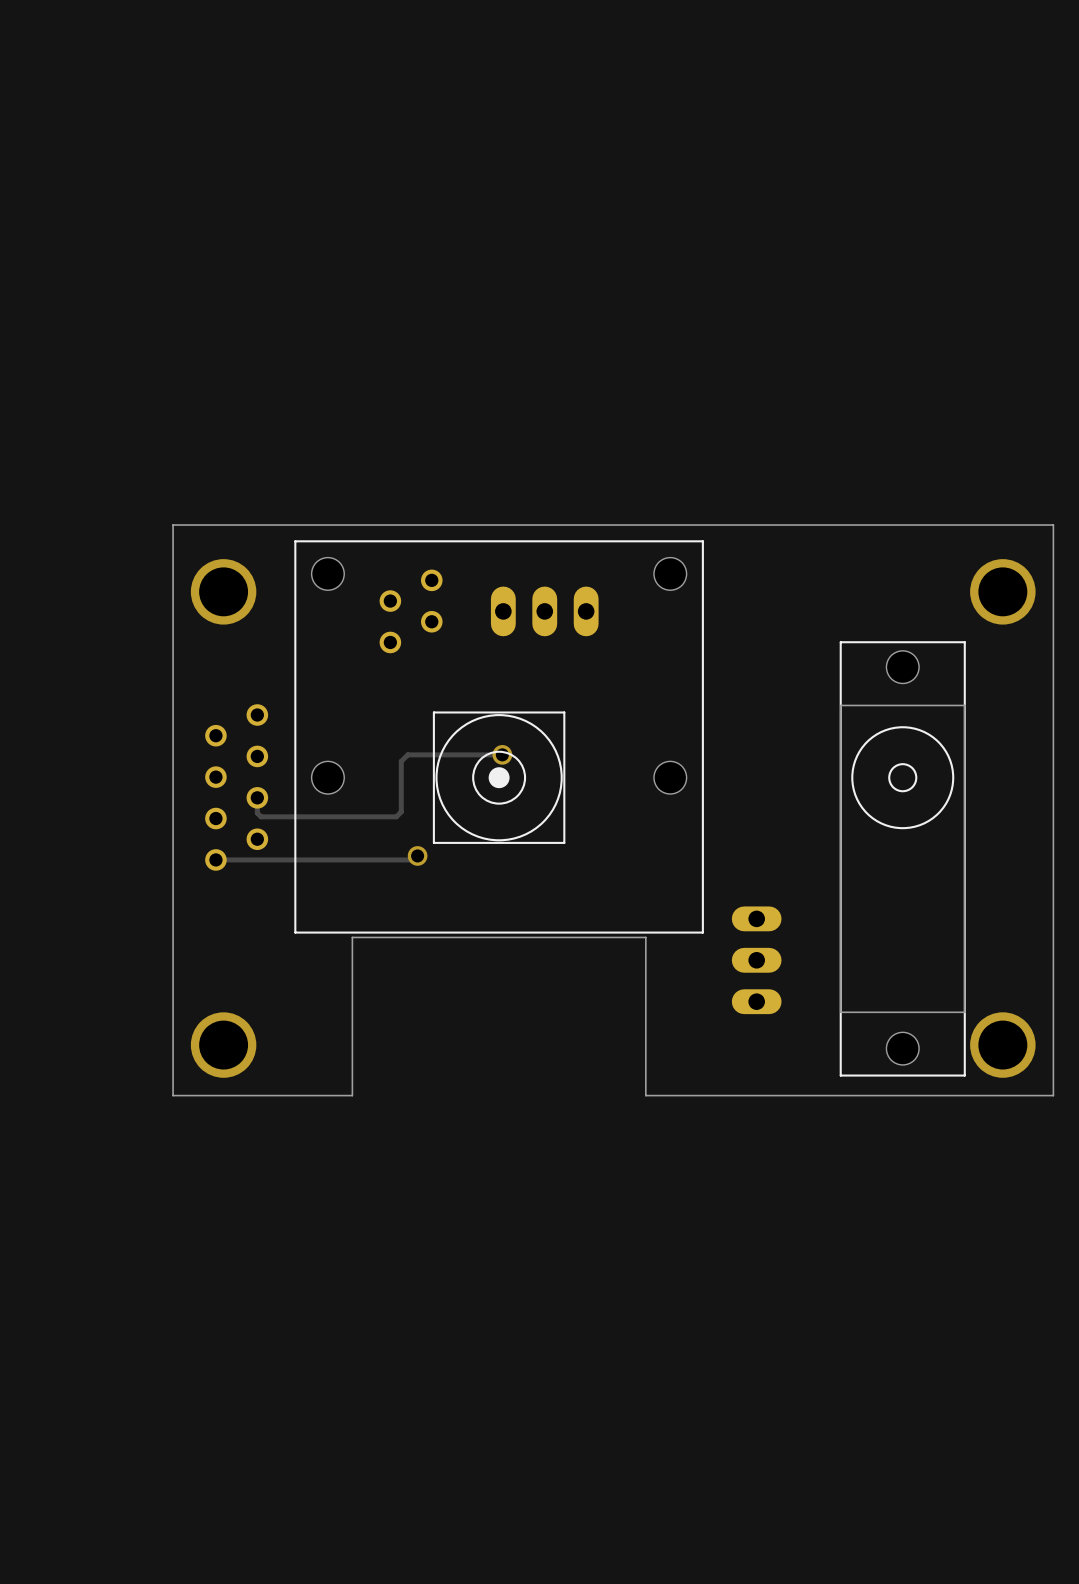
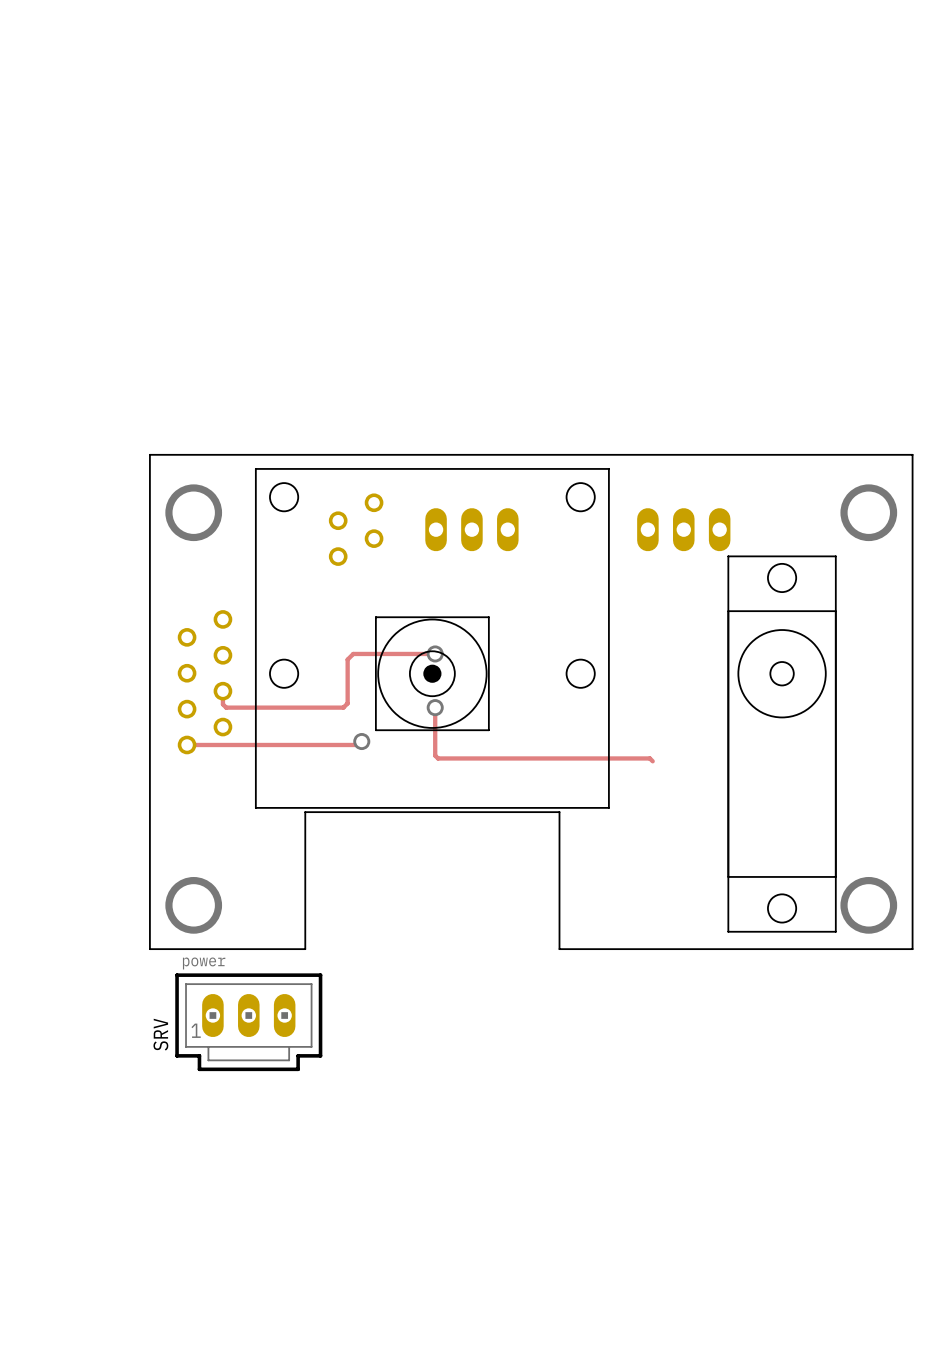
track: none -> (435, 707) (435, 755) (438, 758) (649, 758) (652, 761)
via: none -> (435, 707)
part rotation: 0° (756, 960) -> 90° clockwise (683, 529)
part position: (756, 960) -> (683, 529)
SRV: none -> power (248, 1022)

